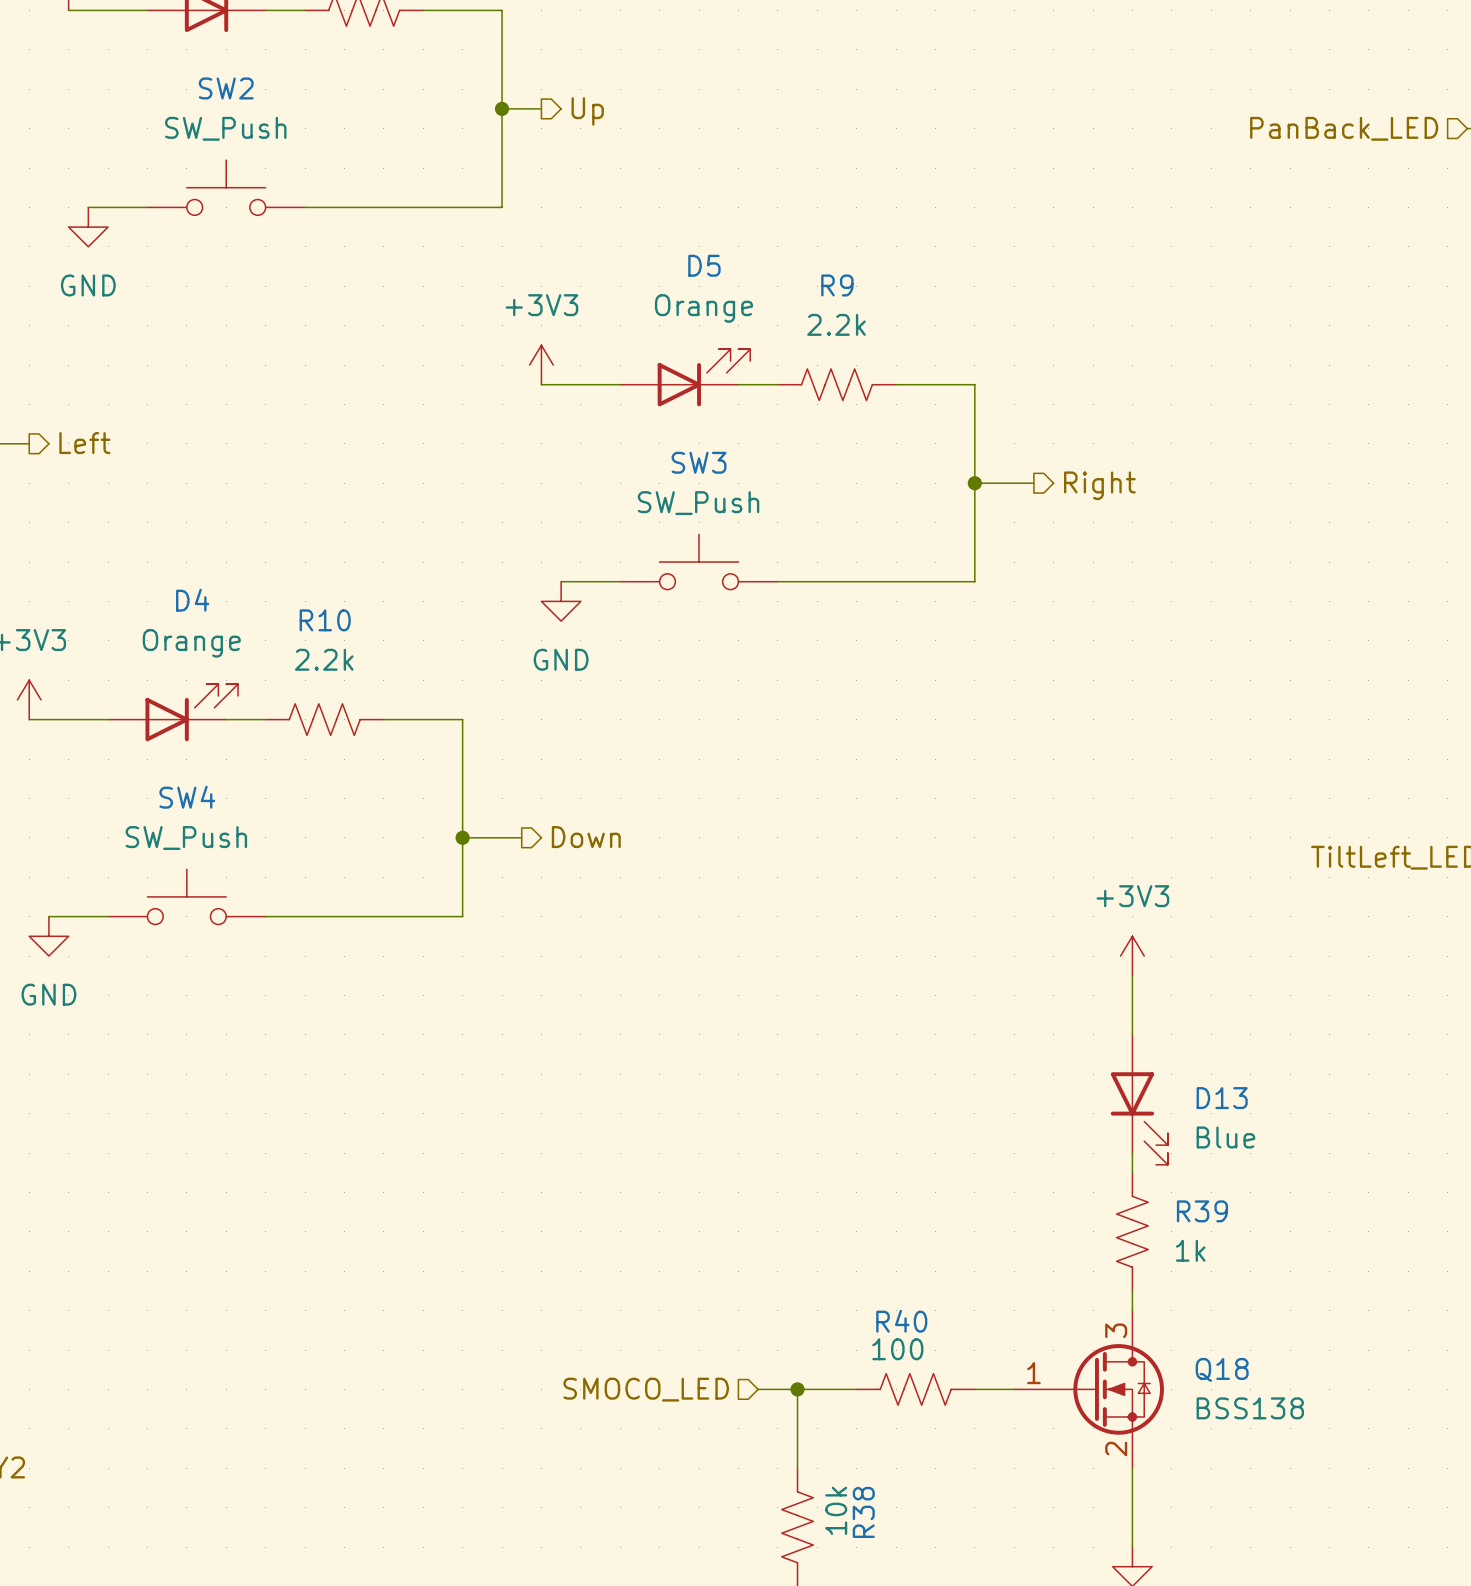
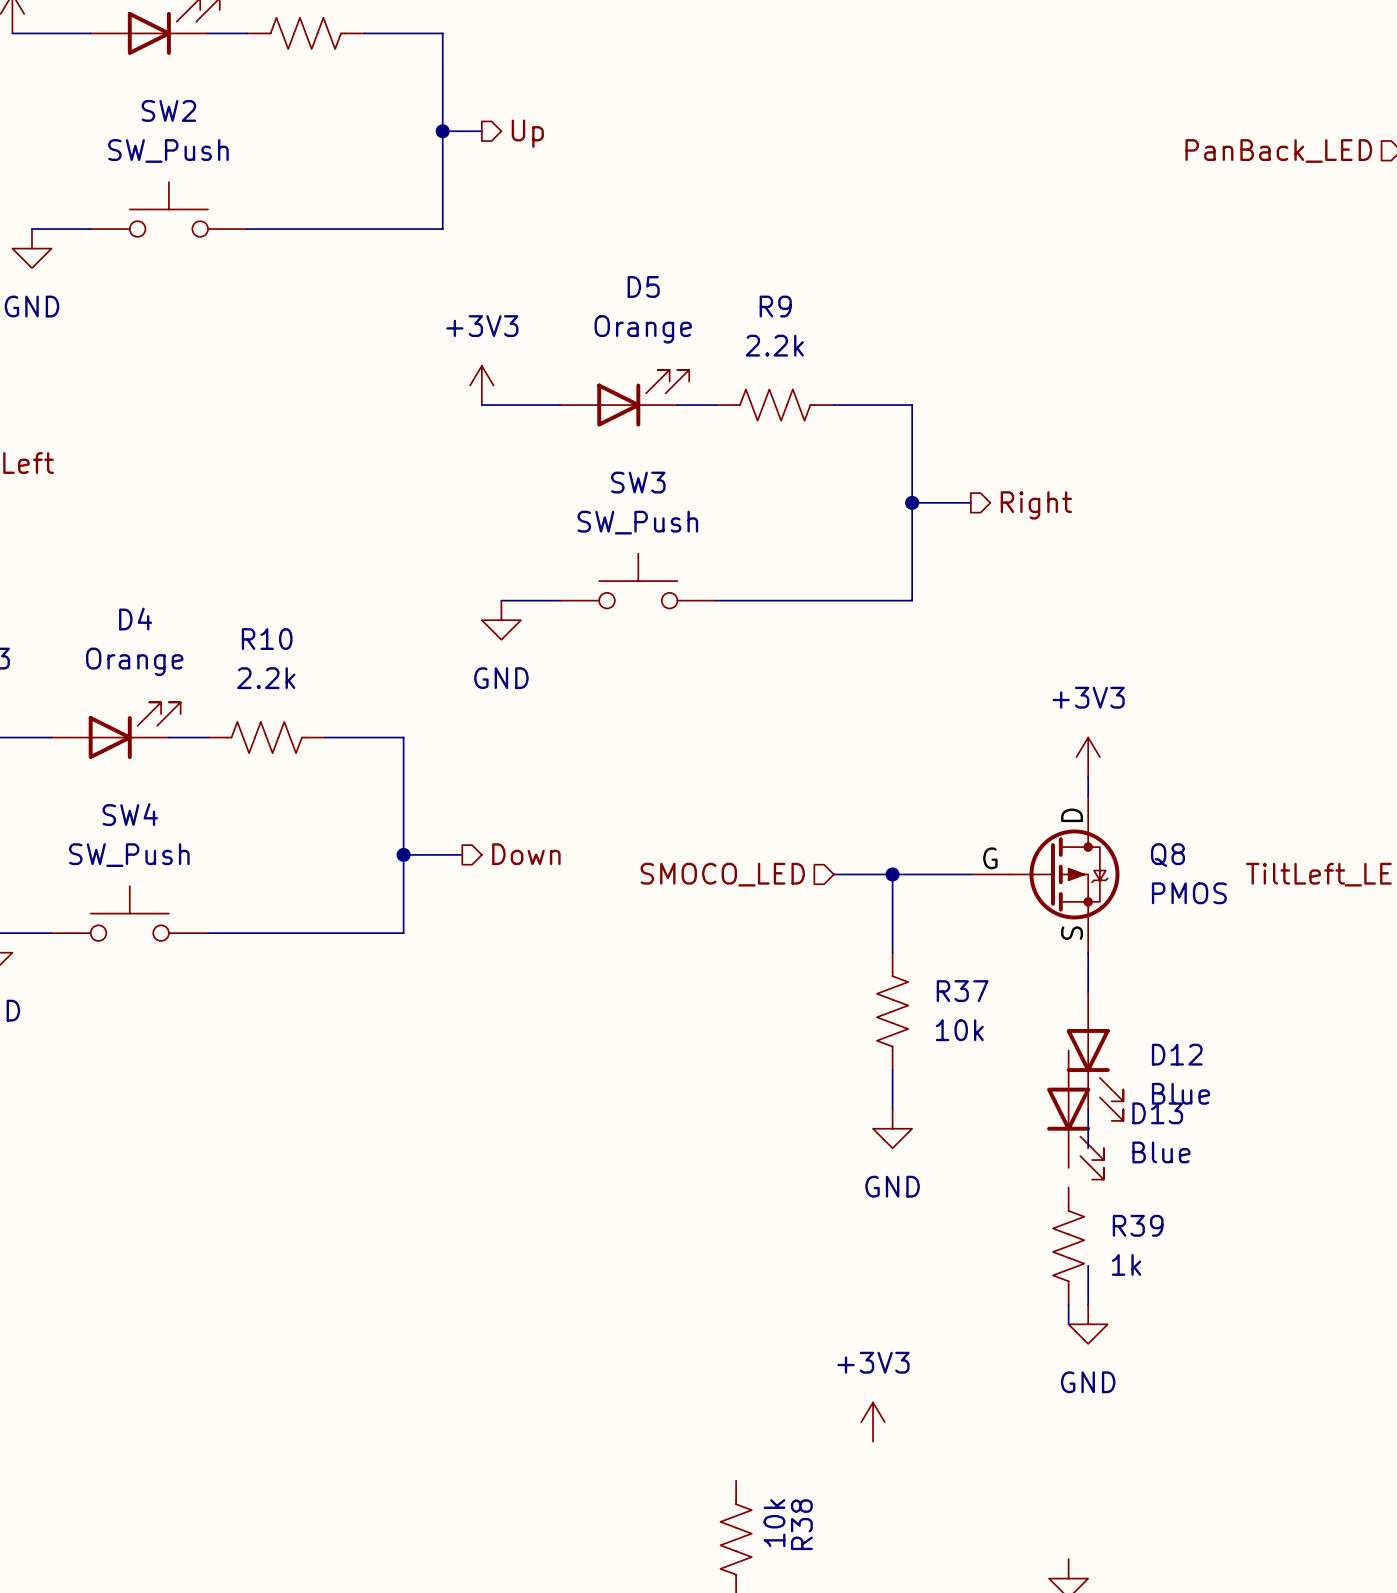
wire: none -> (1088, 776) (1088, 796)
hierarchical label: none -> SMOCO_LED (722, 874)
wire: none -> (833, 874) (970, 874)
wire: none -> (892, 874) (892, 952)
junction: none -> (892, 874)
Q8: none -> PMOS (1045, 874)
wire: none -> (1088, 952) (1088, 991)
power symbol position: +3V3 (1132, 956) -> +3V3 (1088, 757)
wire: (1132, 975) (1132, 1034) -> none
R37: none -> 10k (892, 1011)
D12: none -> Blue (1095, 1056)
wire: none -> (892, 1070) (892, 1109)
wire: none -> (1088, 1109) (1088, 1148)
power symbol: none -> GND (892, 1128)
wire: (1132, 1153) (1132, 1172) -> none
wire: none -> (1088, 1265) (1088, 1304)
power symbol: none -> GND (1088, 1324)
hierarchical label: SMOCO_LED (646, 1389) -> none
wire: (758, 1389) (856, 1389) -> none
wire: (797, 1389) (797, 1468) -> none
junction: (797, 1389) -> none
R40: 100 (915, 1389) -> none
wire: (974, 1389) (1014, 1389) -> none
Q18: BSS138 (1089, 1389) -> none
power symbol: none -> +3V3 (873, 1422)
wire: (1132, 1468) (1132, 1547) -> none

